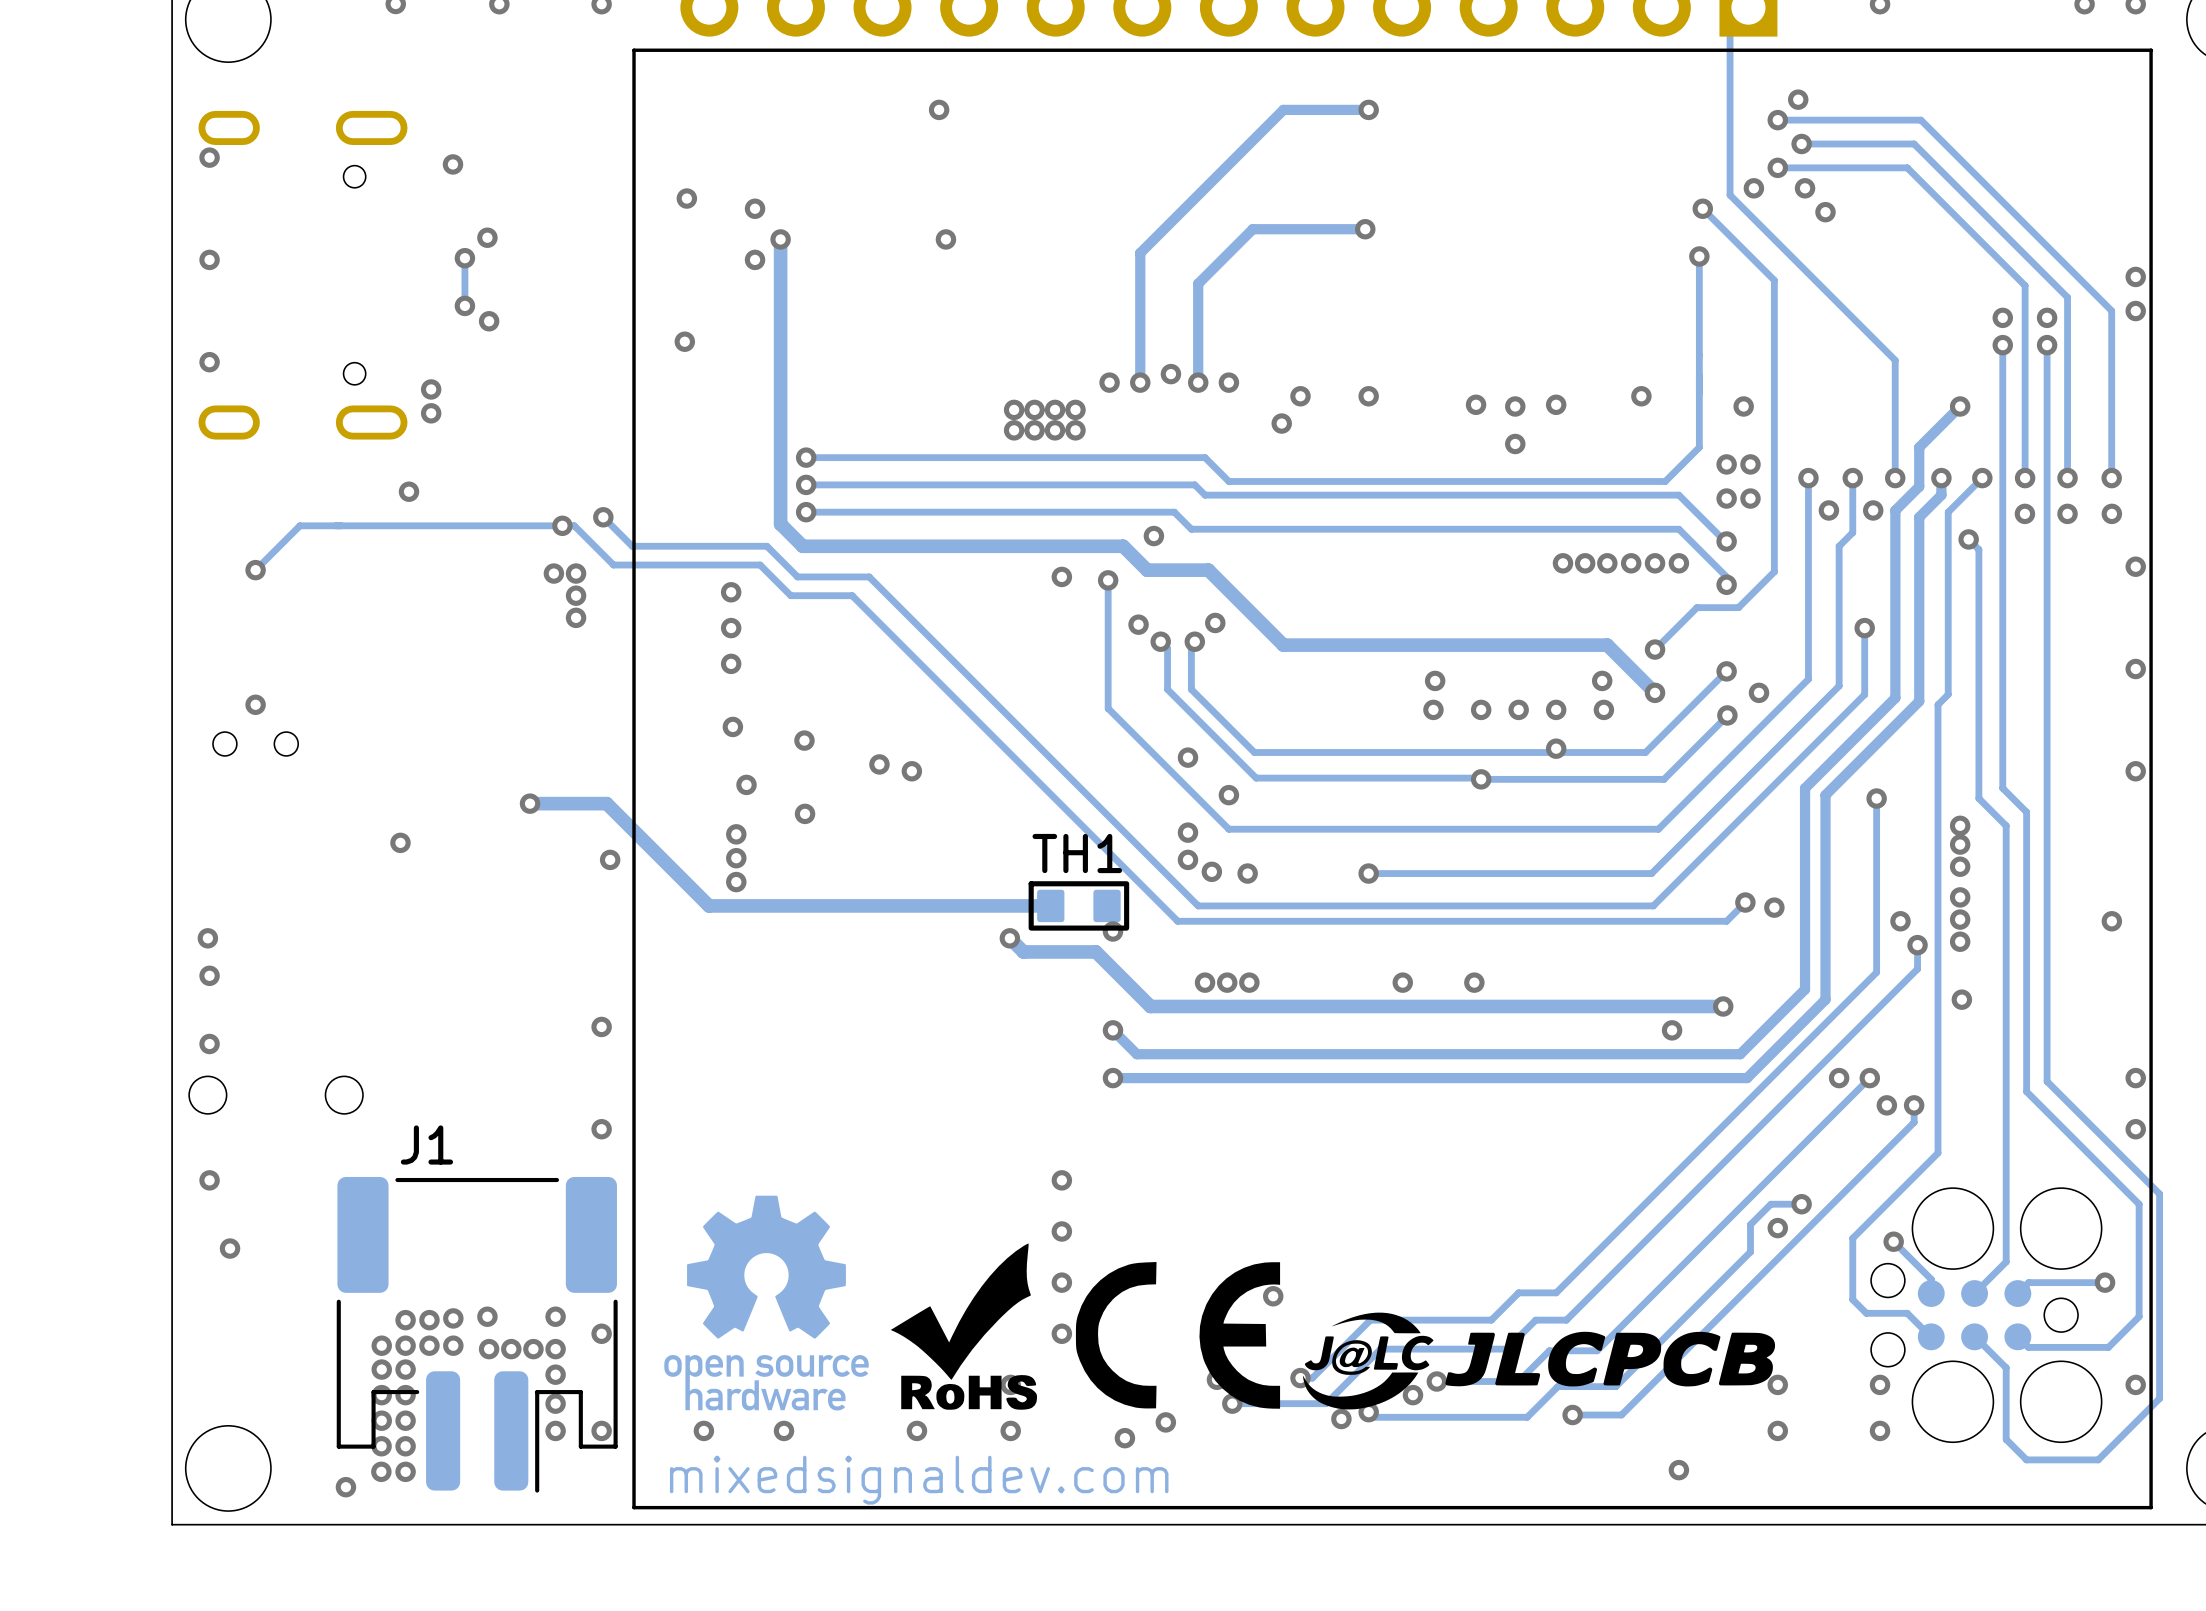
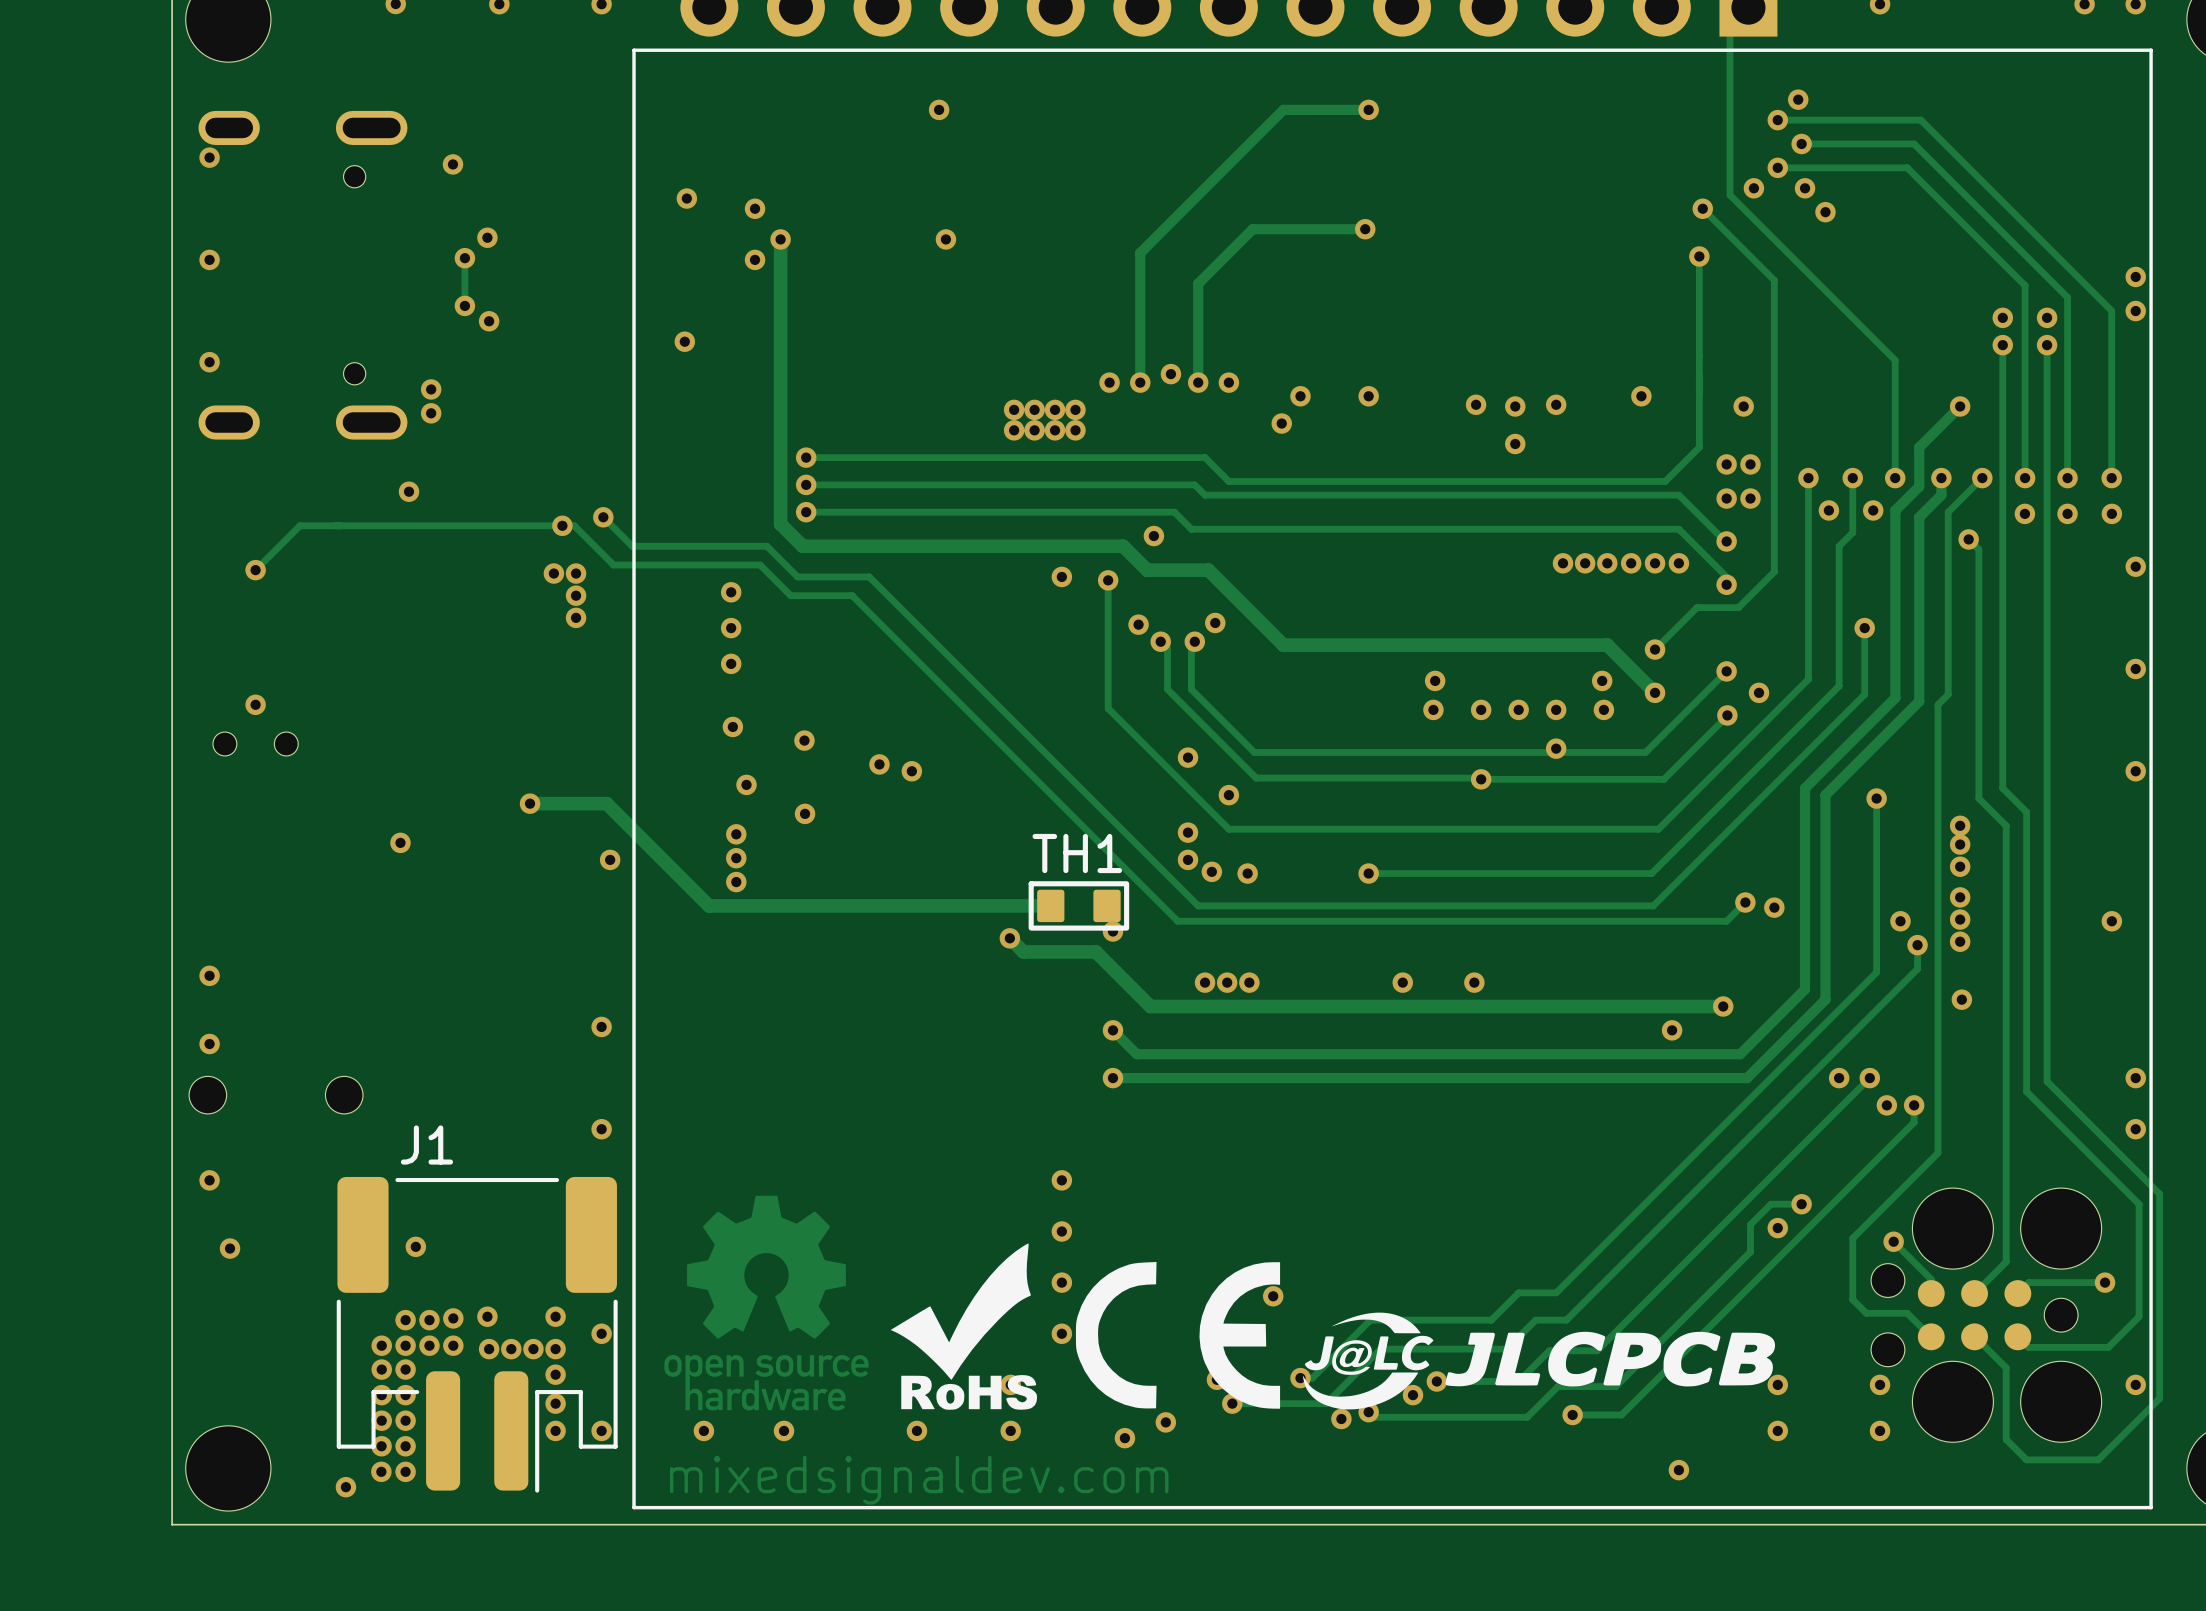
via: (207, 938) -> none
via: none -> (415, 1246)

